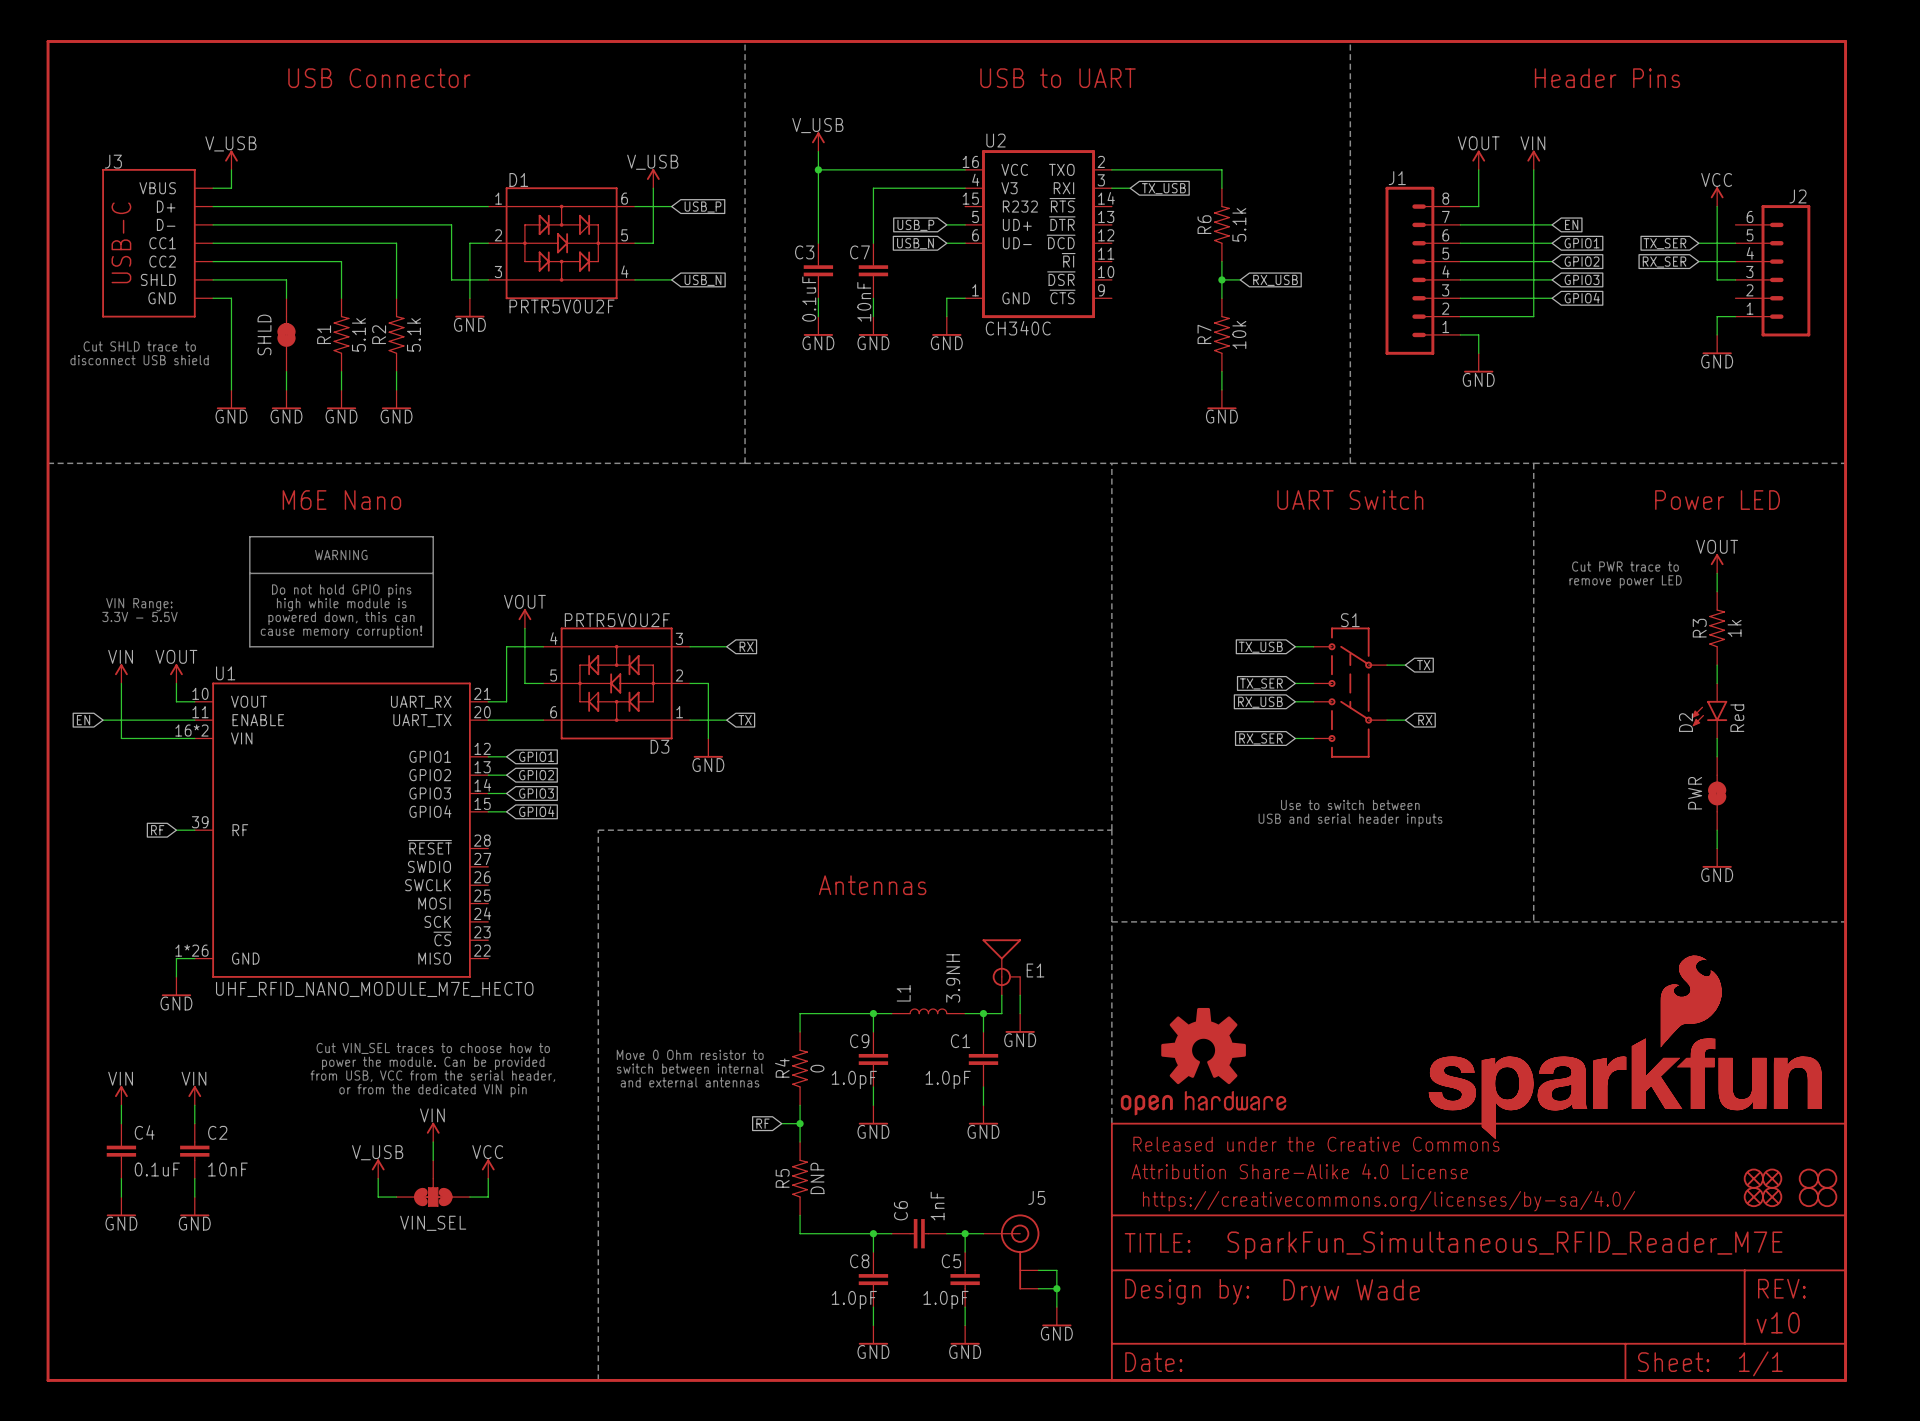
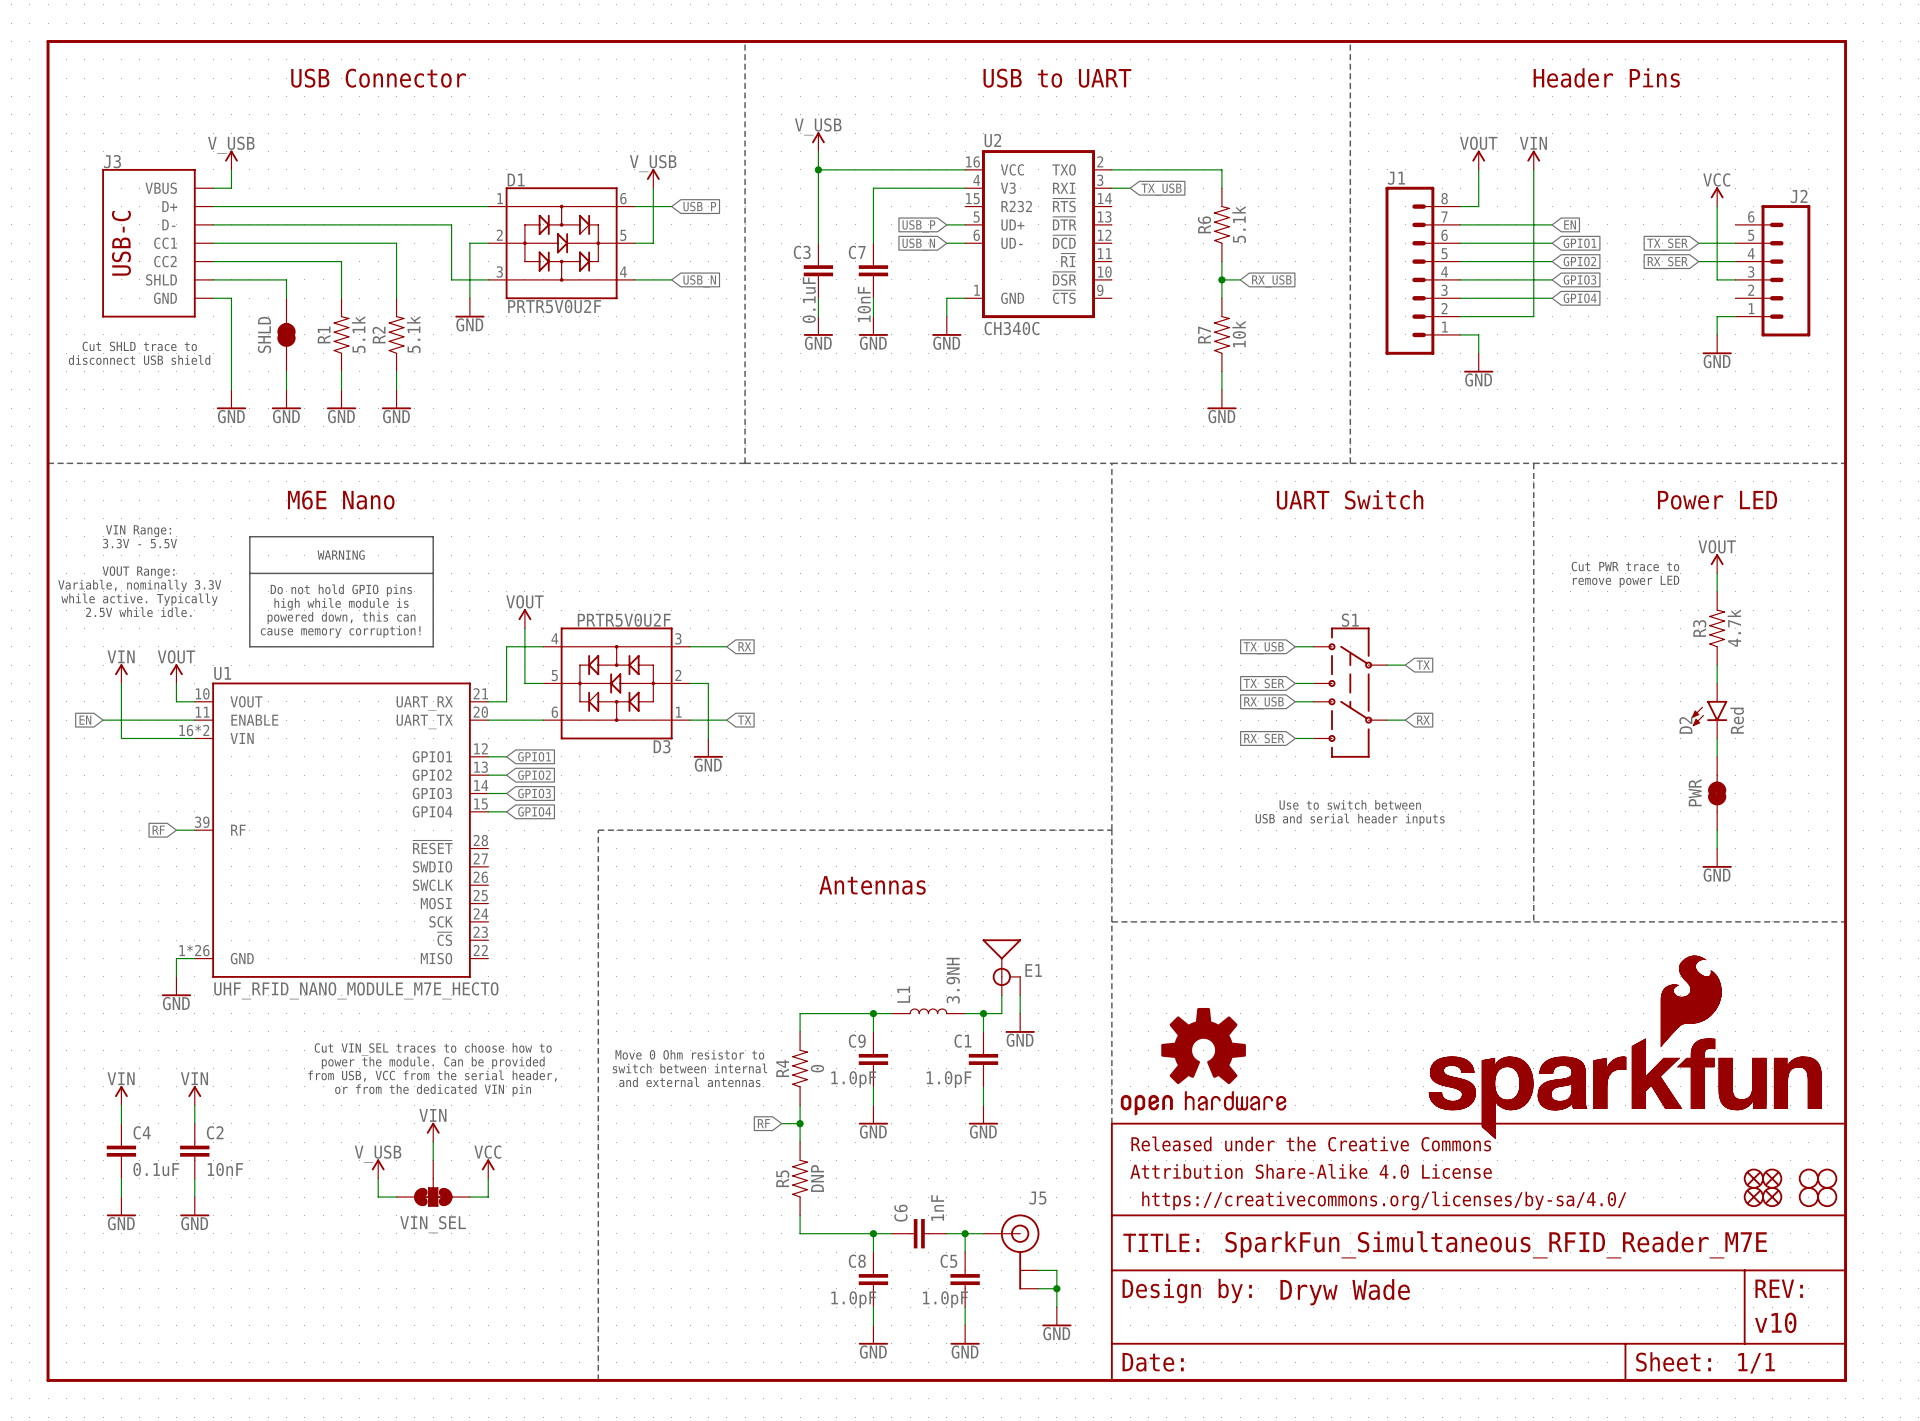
text: none -> VOUT Range: (138, 572)
text: none -> Variable, nominally 3.3V (139, 585)
text: none -> while active. Typically (139, 599)
text position: VIN Range: (139, 604) -> VIN Range: (138, 531)
text: none -> 2.5V while idle. (138, 612)
text position: 3.3V - 5.5V (139, 616) -> 3.3V - 5.5V (139, 543)
R3 value: 1k (1734, 628) -> 4.7k (1734, 628)

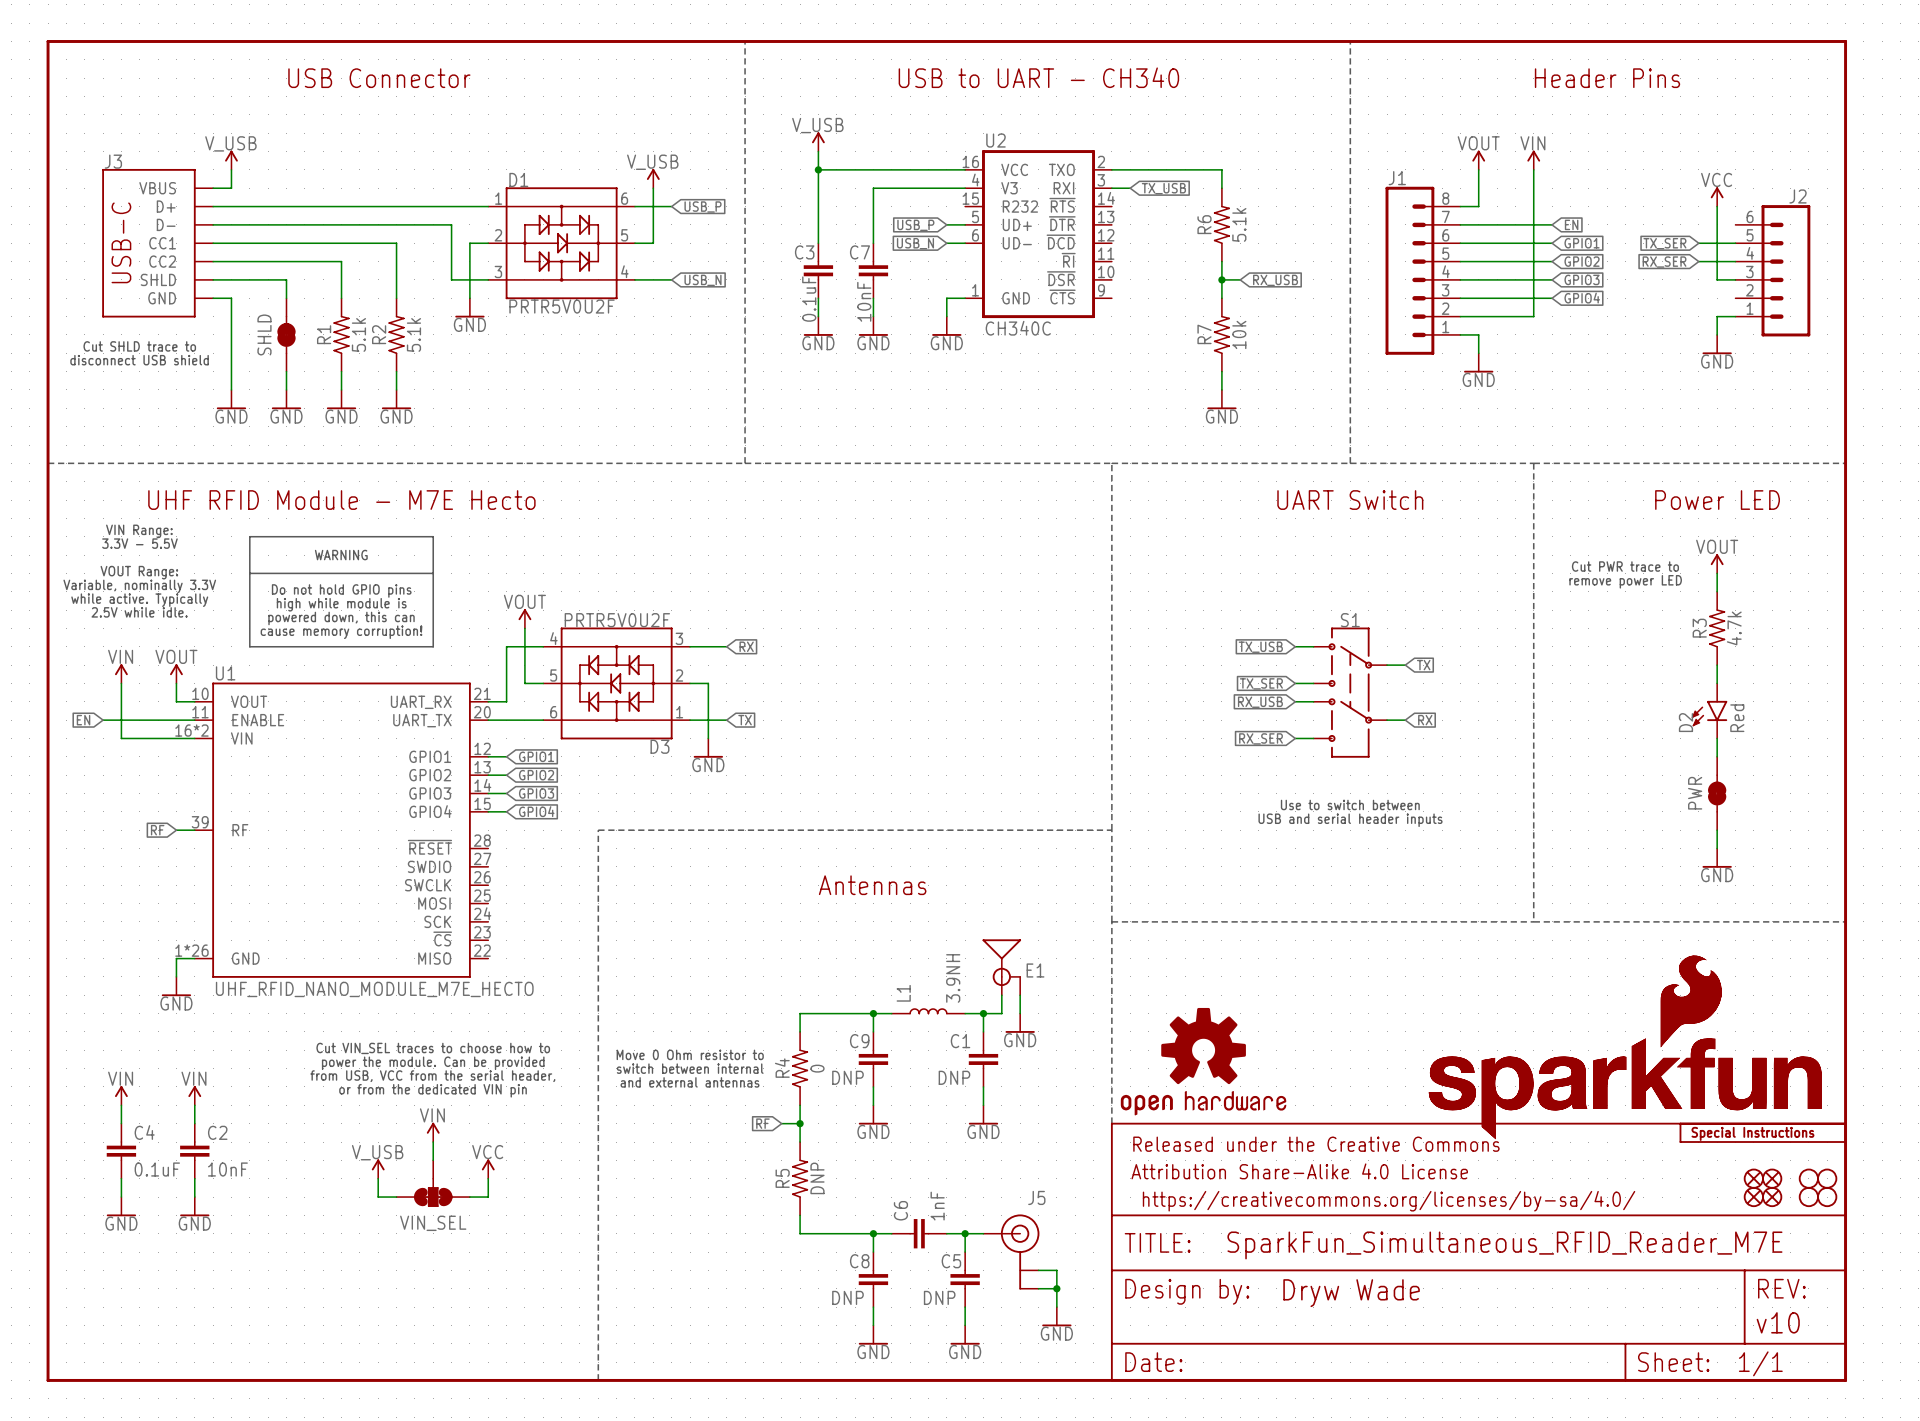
text: USB to UART (1057, 78) -> USB to UART - CH340 (1038, 77)
text: M6E Nano (341, 500) -> UHF RFID Module - M7E Hecto (341, 500)
C9 value: 1.0pF (853, 1079) -> DNP (847, 1077)
C1 value: 1.0pF (949, 1079) -> DNP (954, 1077)
part: none -> (1763, 1132)
C8 value: 1.0pF (853, 1299) -> DNP (847, 1297)
C5 value: 1.0pF (945, 1299) -> DNP (939, 1297)

